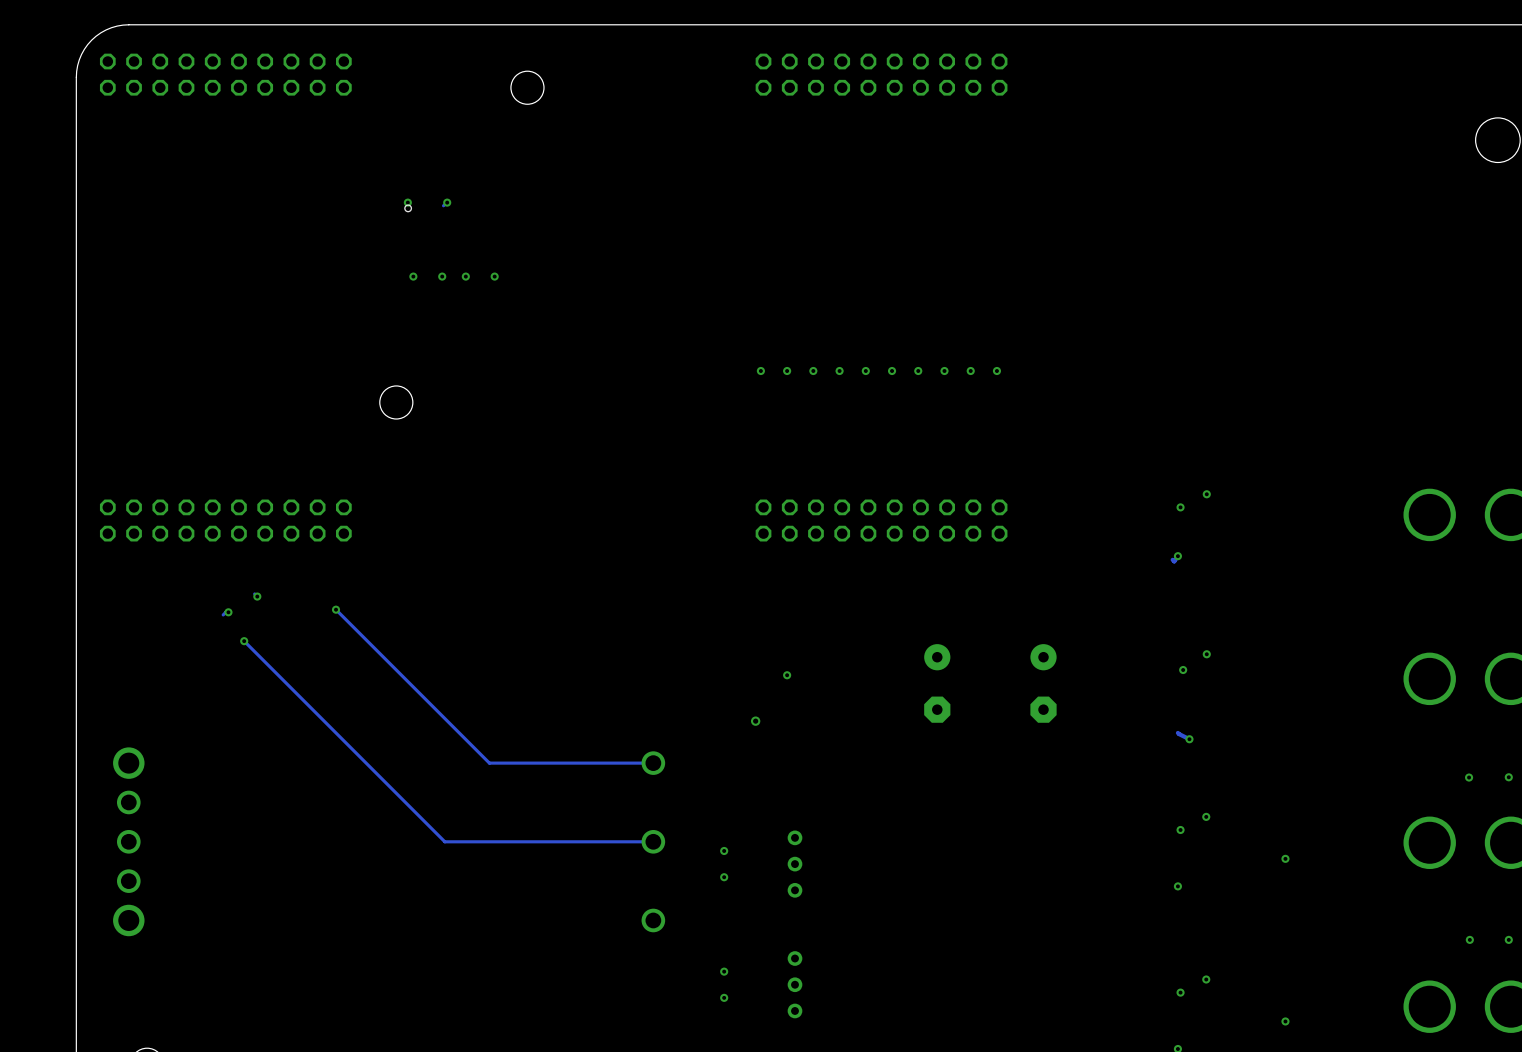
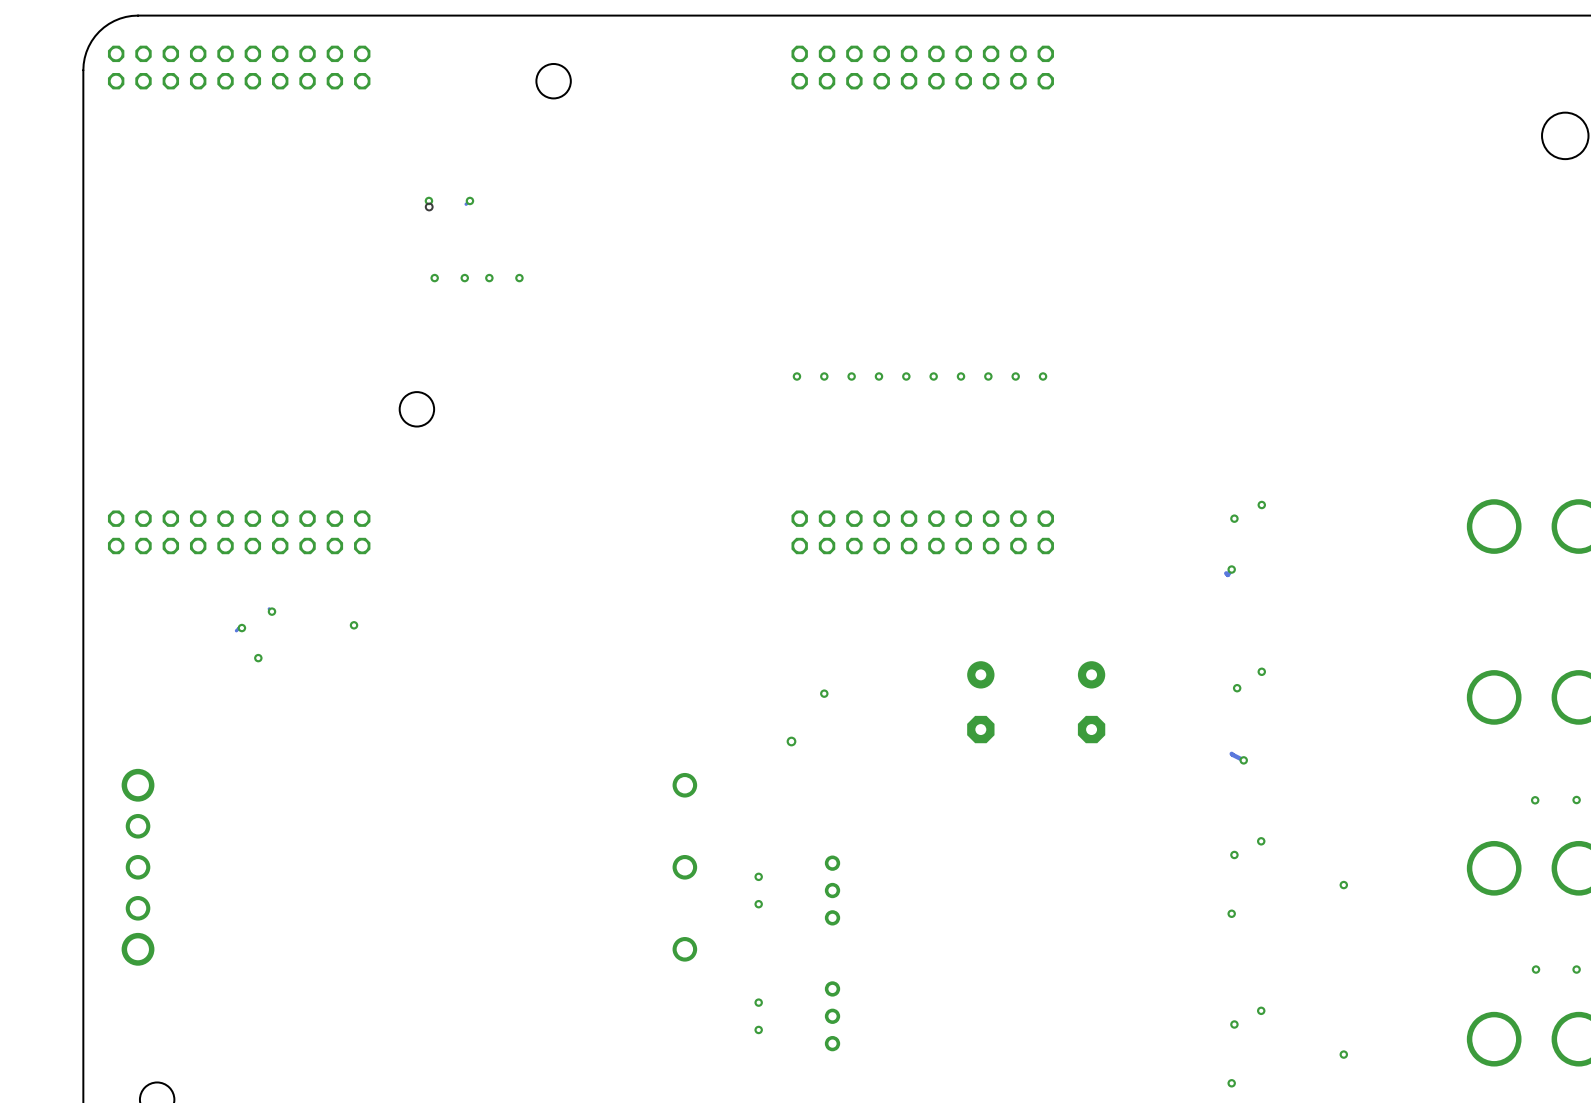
track: (335, 609) (489, 763) (653, 763) -> none
track: (244, 641) (444, 841) (653, 841) -> none

